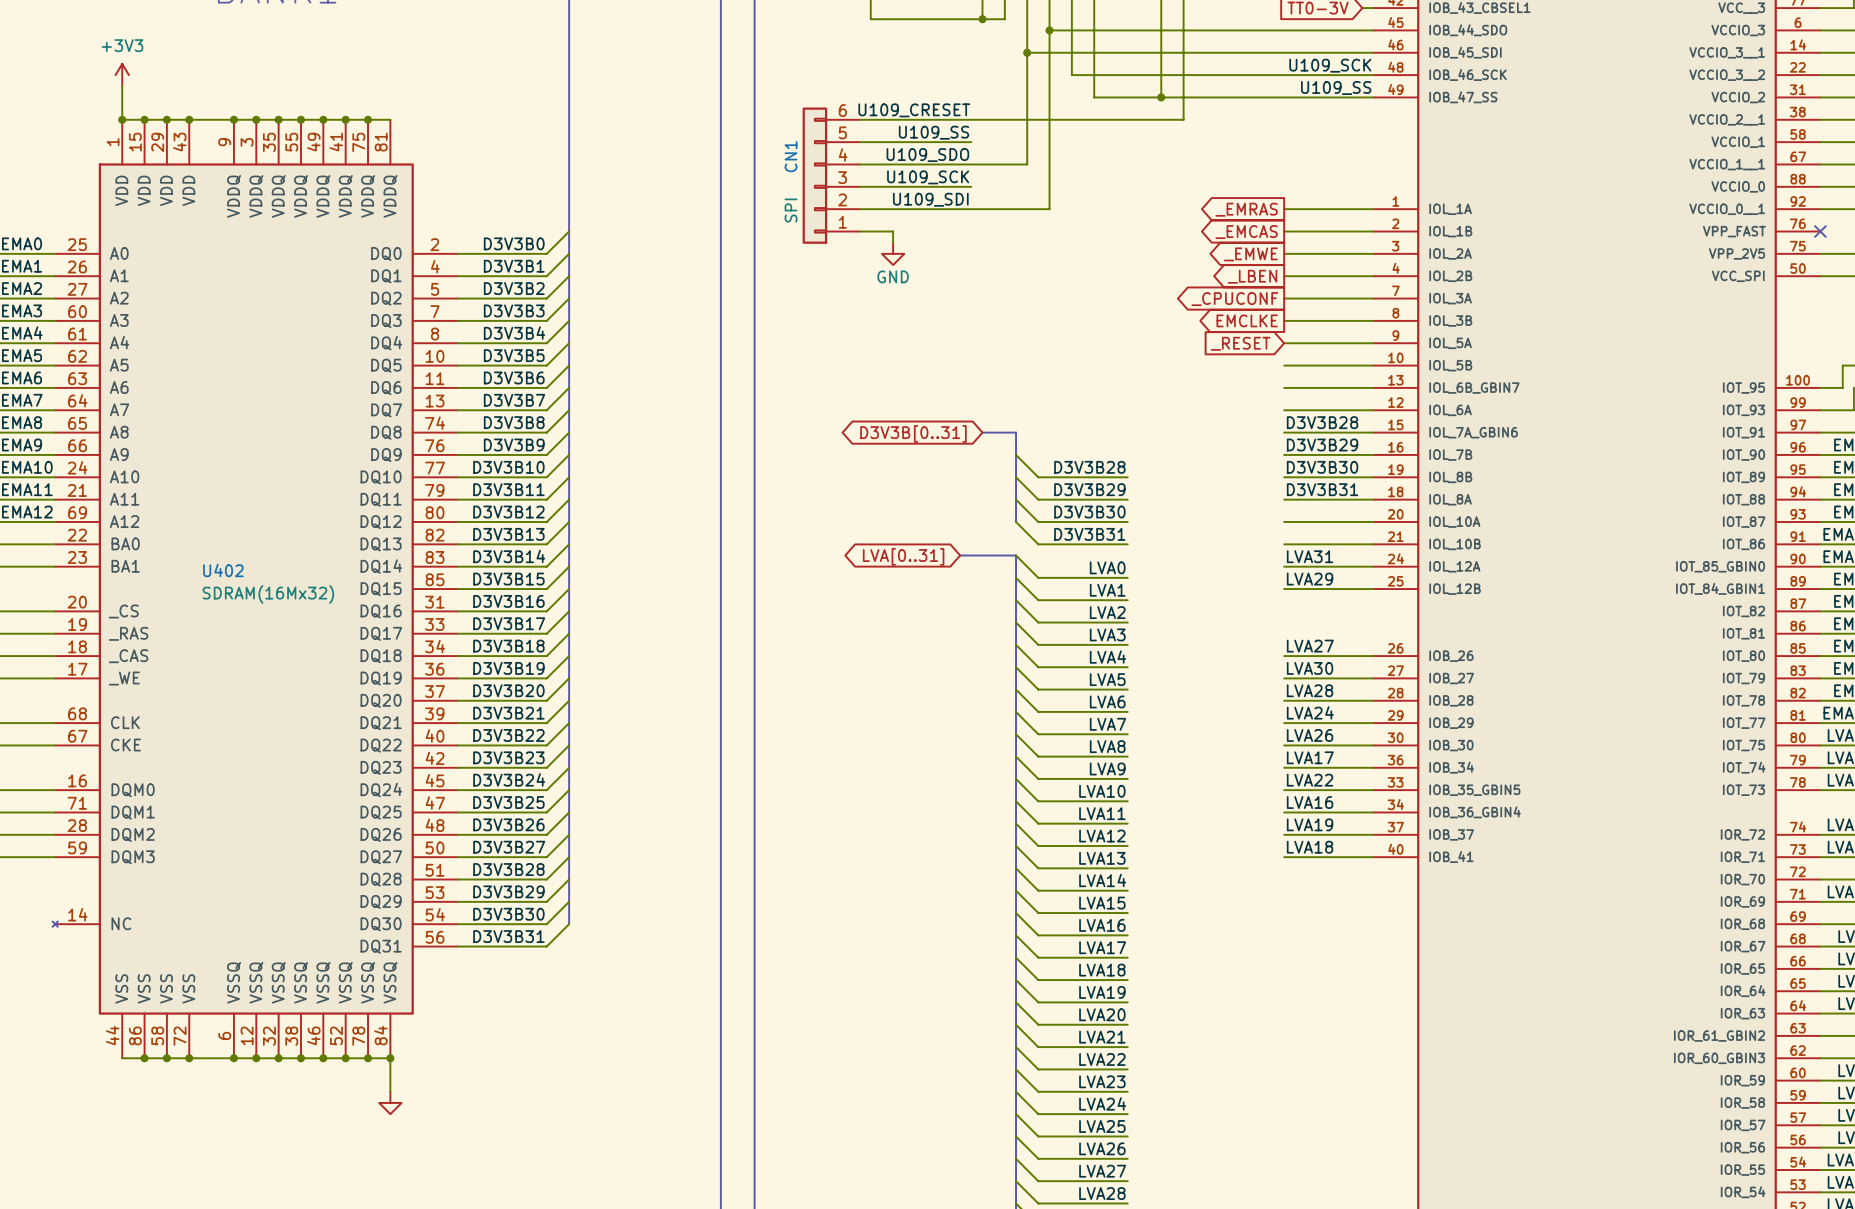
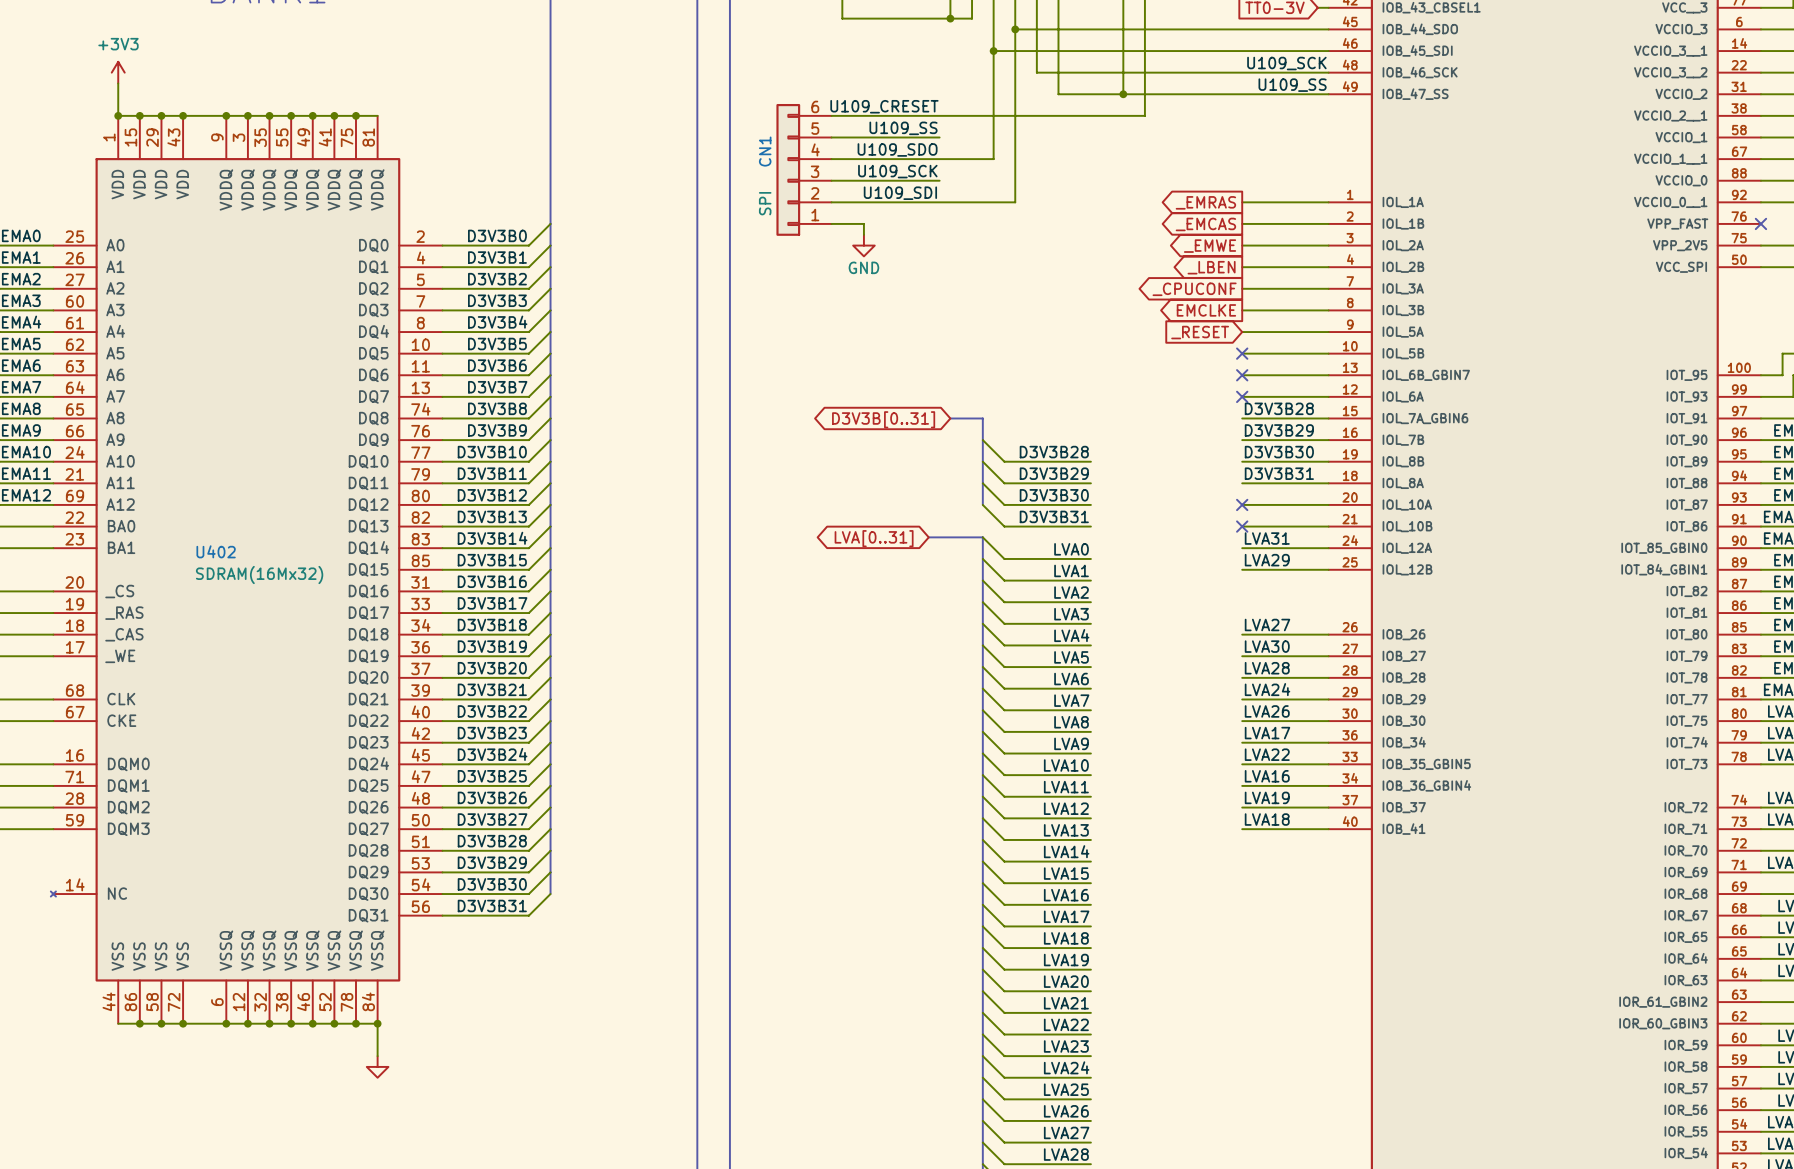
no-connect mark: none -> (1242, 353)
no-connect mark: none -> (1242, 375)
no-connect mark: none -> (1242, 396)
no-connect mark: none -> (1242, 504)
no-connect mark: none -> (1242, 526)

